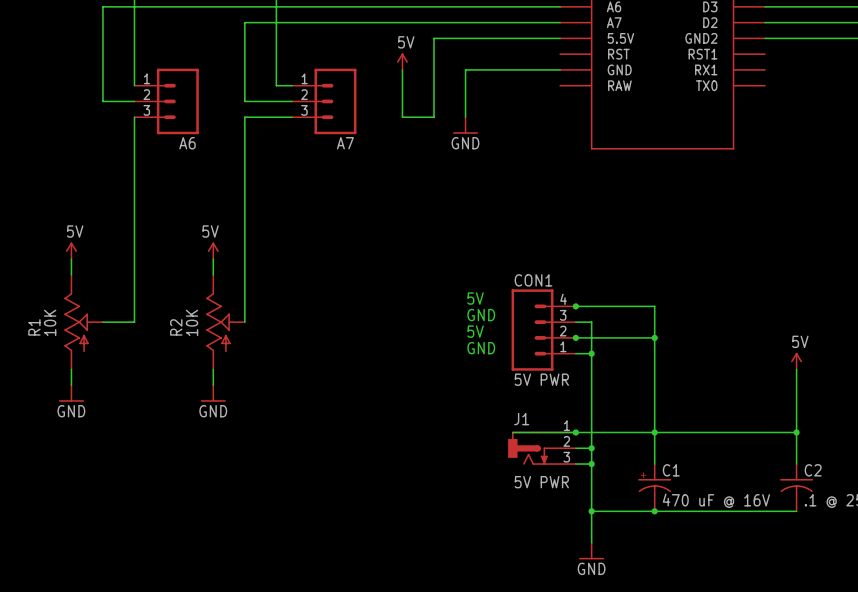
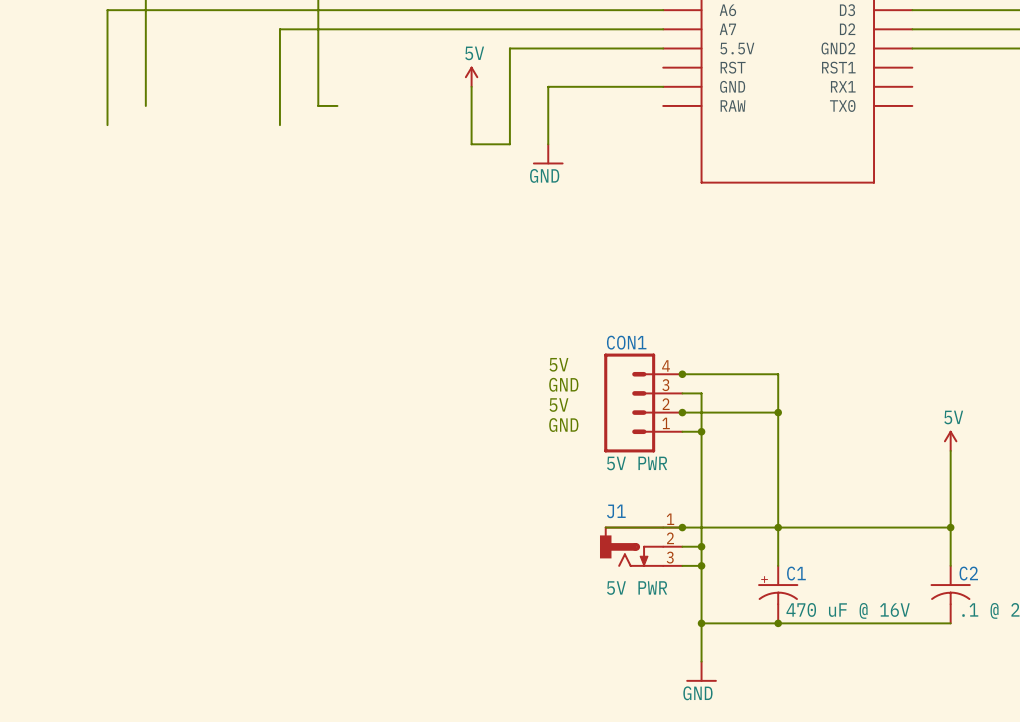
wire: (102, 101) (134, 101) -> none
A6: (166, 101) -> none
wire: (244, 101) (292, 101) -> none
A7: (324, 101) -> none
wire: (134, 117) (134, 322) (102, 322) -> none
wire: (292, 117) (244, 117) (244, 322) -> none
power symbol: 5V (71, 250) -> none
power symbol: 5V (213, 250) -> none
wire: (71, 259) (71, 274) -> none
wire: (213, 259) (213, 274) -> none
R1: 10K (83, 322) -> none
R2: 10K (225, 322) -> none
wire: (71, 369) (71, 385) -> none
wire: (213, 369) (213, 385) -> none
power symbol: GND (71, 393) -> none
power symbol: GND (213, 393) -> none

